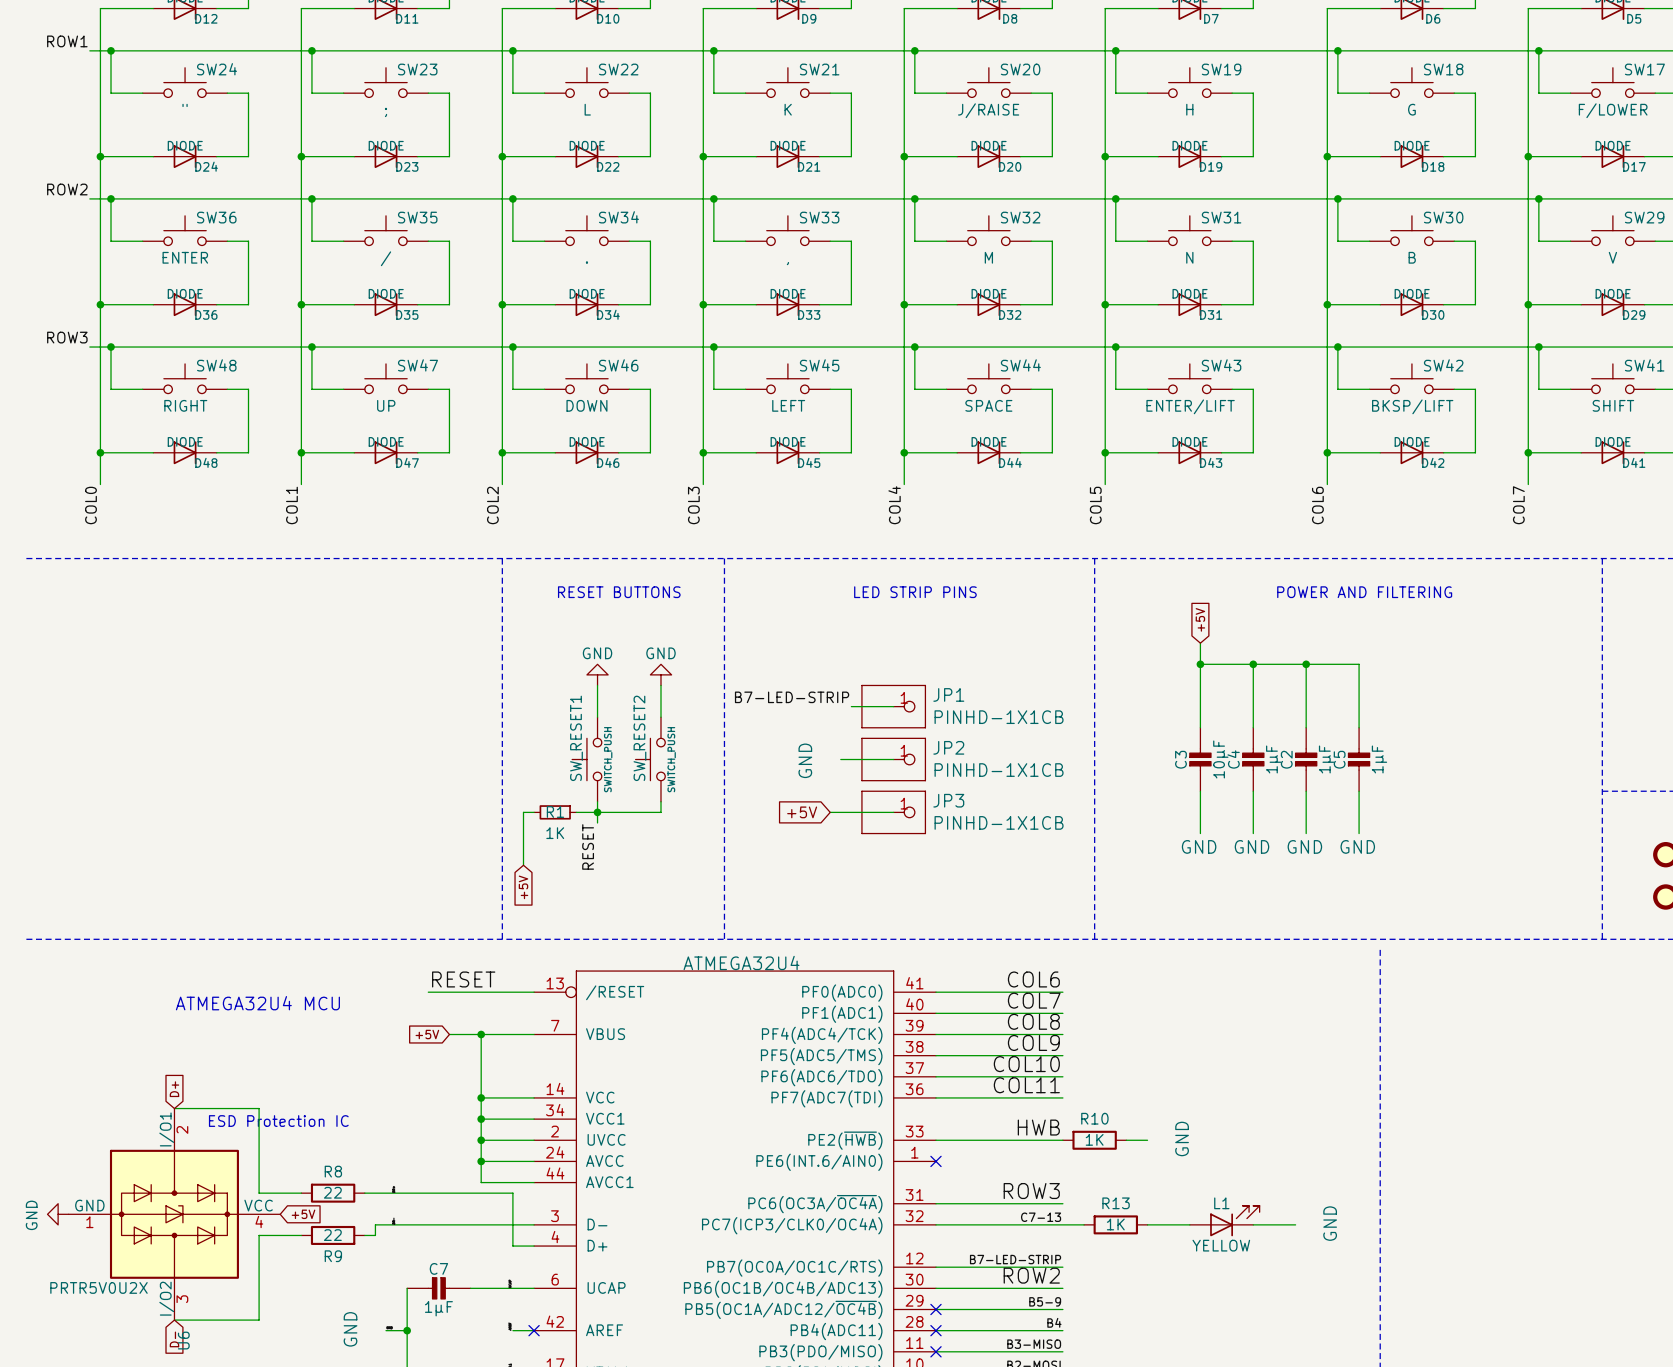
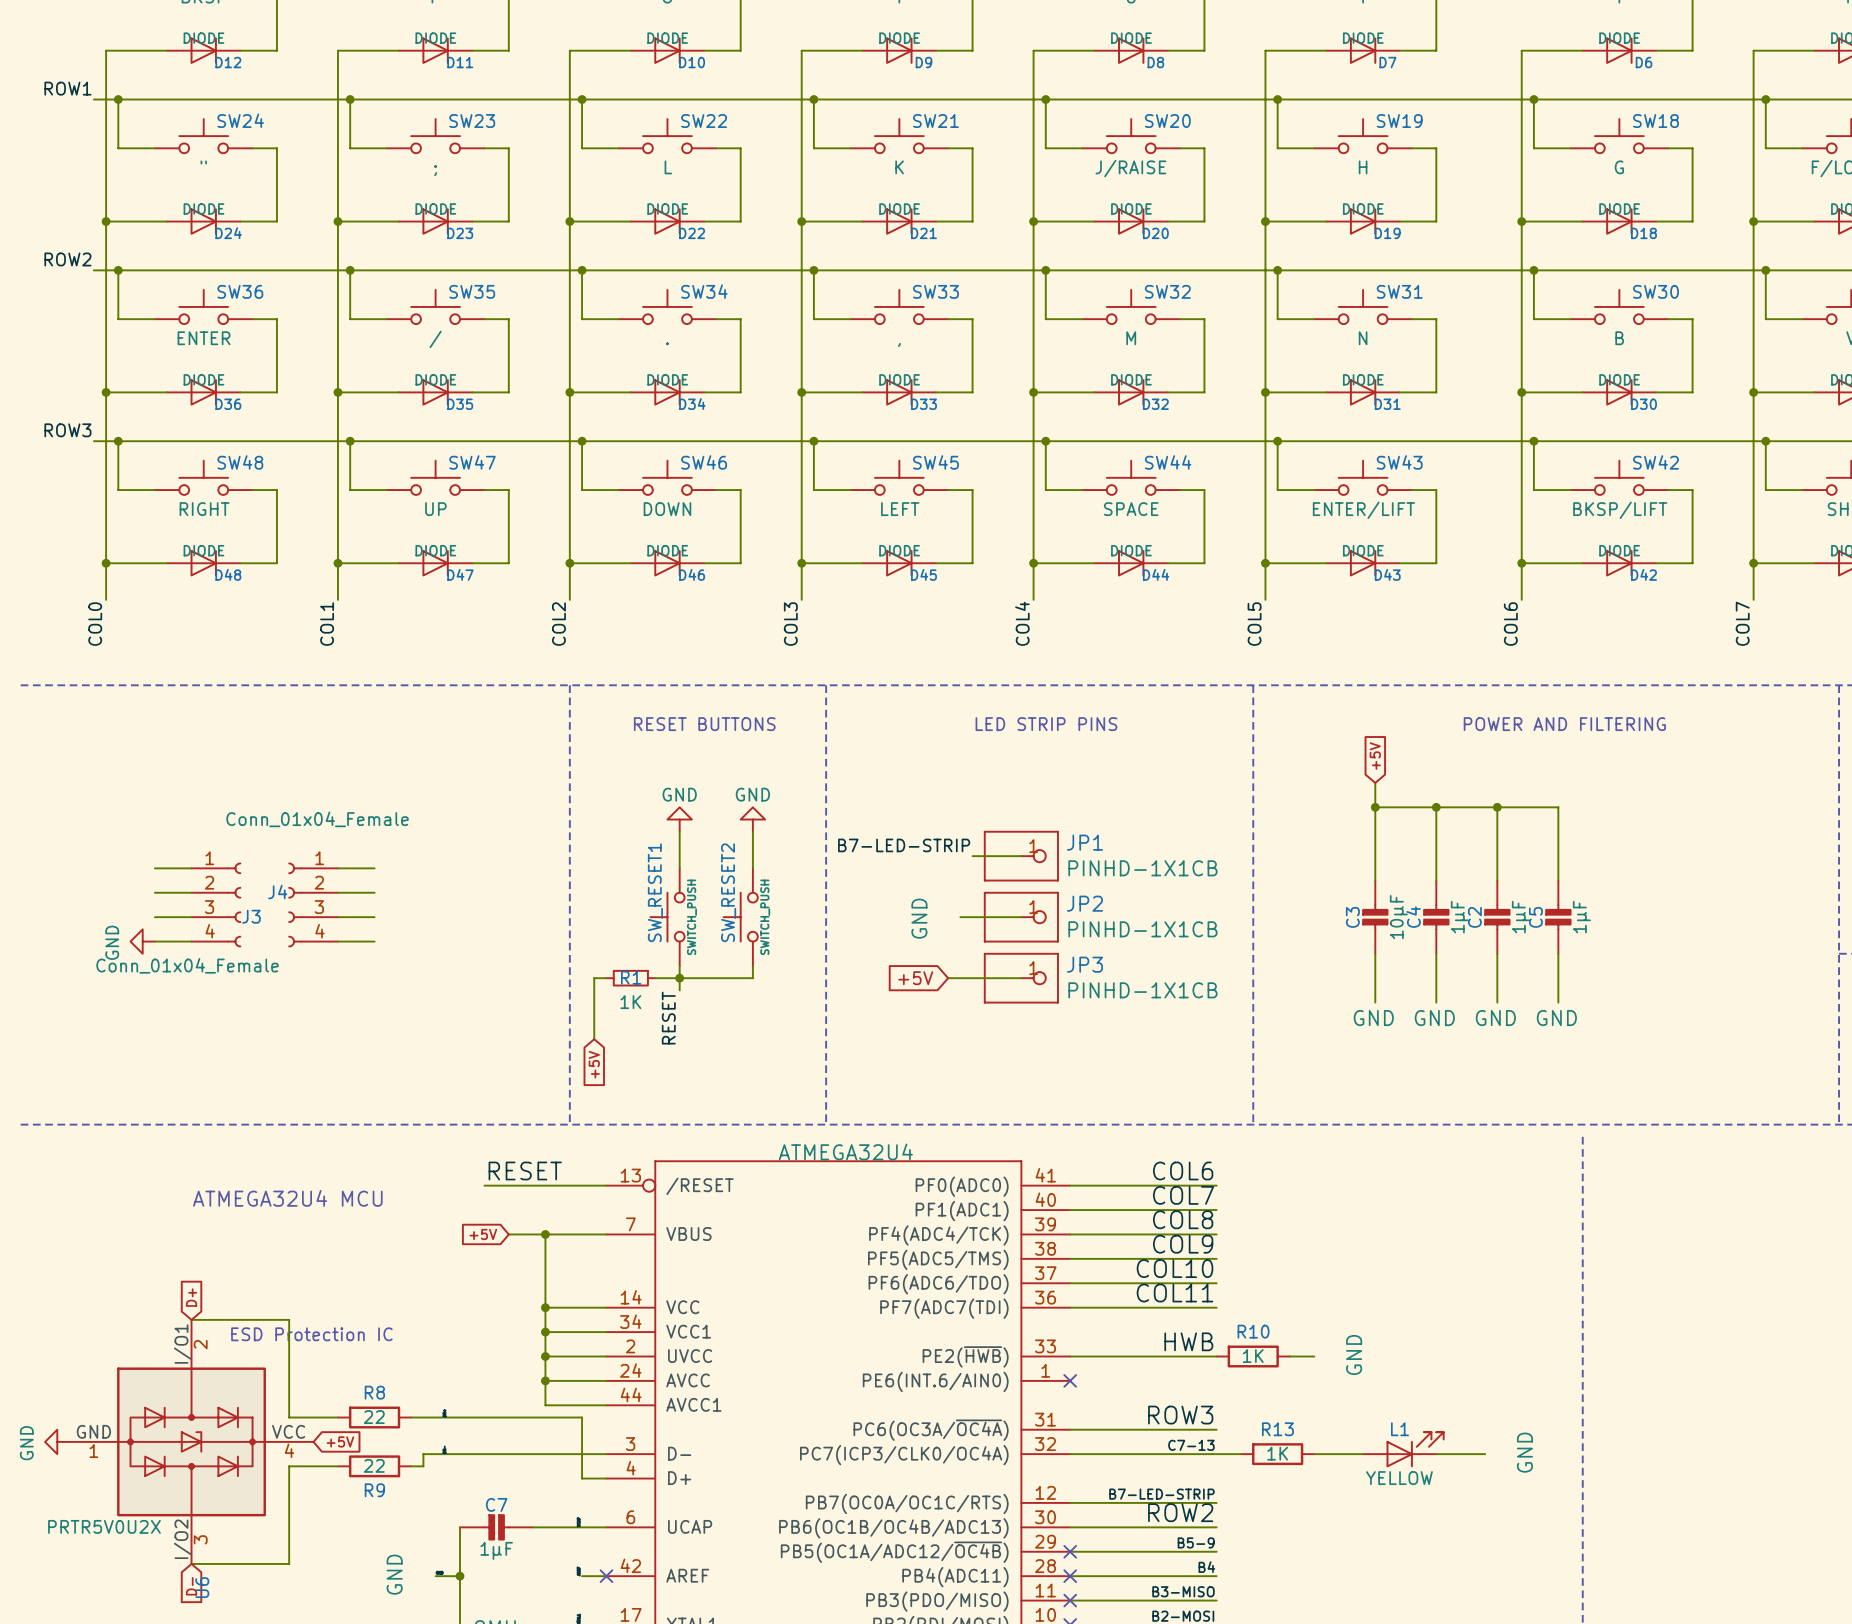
wire: none -> (154, 868) (191, 868)
wire: none -> (337, 868) (374, 868)
wire: none -> (154, 892) (191, 892)
wire: none -> (337, 892) (374, 892)
J3: none -> Conn_01x04_Female (216, 904)
J4: none -> Conn_01x04_Female (313, 904)
wire: none -> (154, 917) (191, 917)
wire: none -> (337, 917) (374, 917)
power symbol: none -> GND (142, 941)
wire: none -> (154, 941) (191, 941)
wire: none -> (337, 941) (374, 941)

